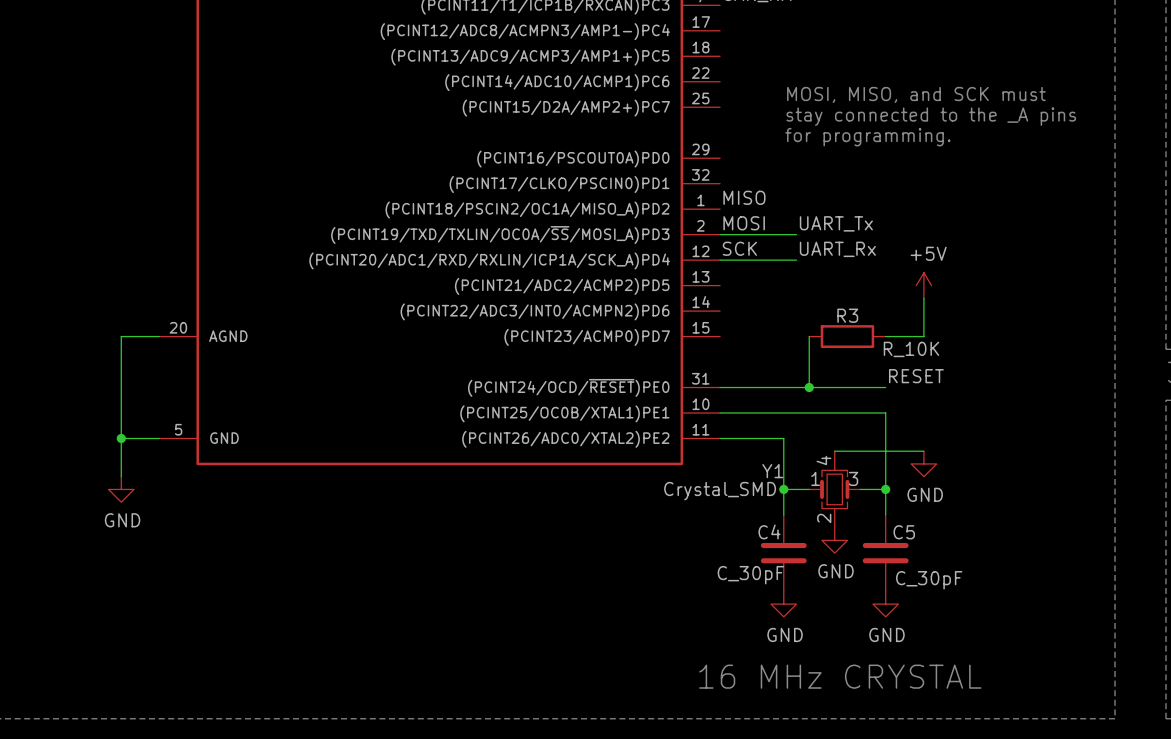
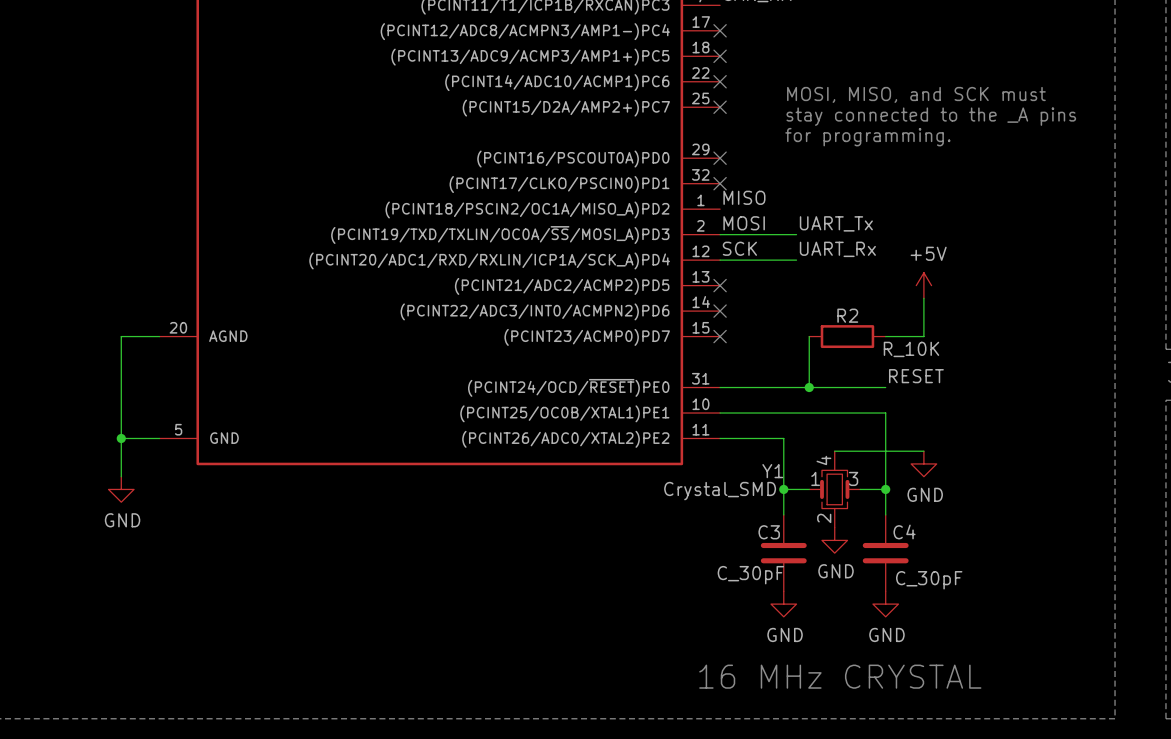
no-connect mark: none -> (720, 30)
no-connect mark: none -> (720, 56)
no-connect mark: none -> (720, 81)
no-connect mark: none -> (720, 107)
no-connect mark: none -> (720, 158)
no-connect mark: none -> (720, 183)
no-connect mark: none -> (720, 285)
no-connect mark: none -> (720, 311)
R3 name: R3 (847, 315) -> R2 (847, 315)
no-connect mark: none -> (720, 336)
C4 name: C4 (769, 531) -> C3 (769, 532)
C5 name: C5 (904, 532) -> C4 (904, 531)

